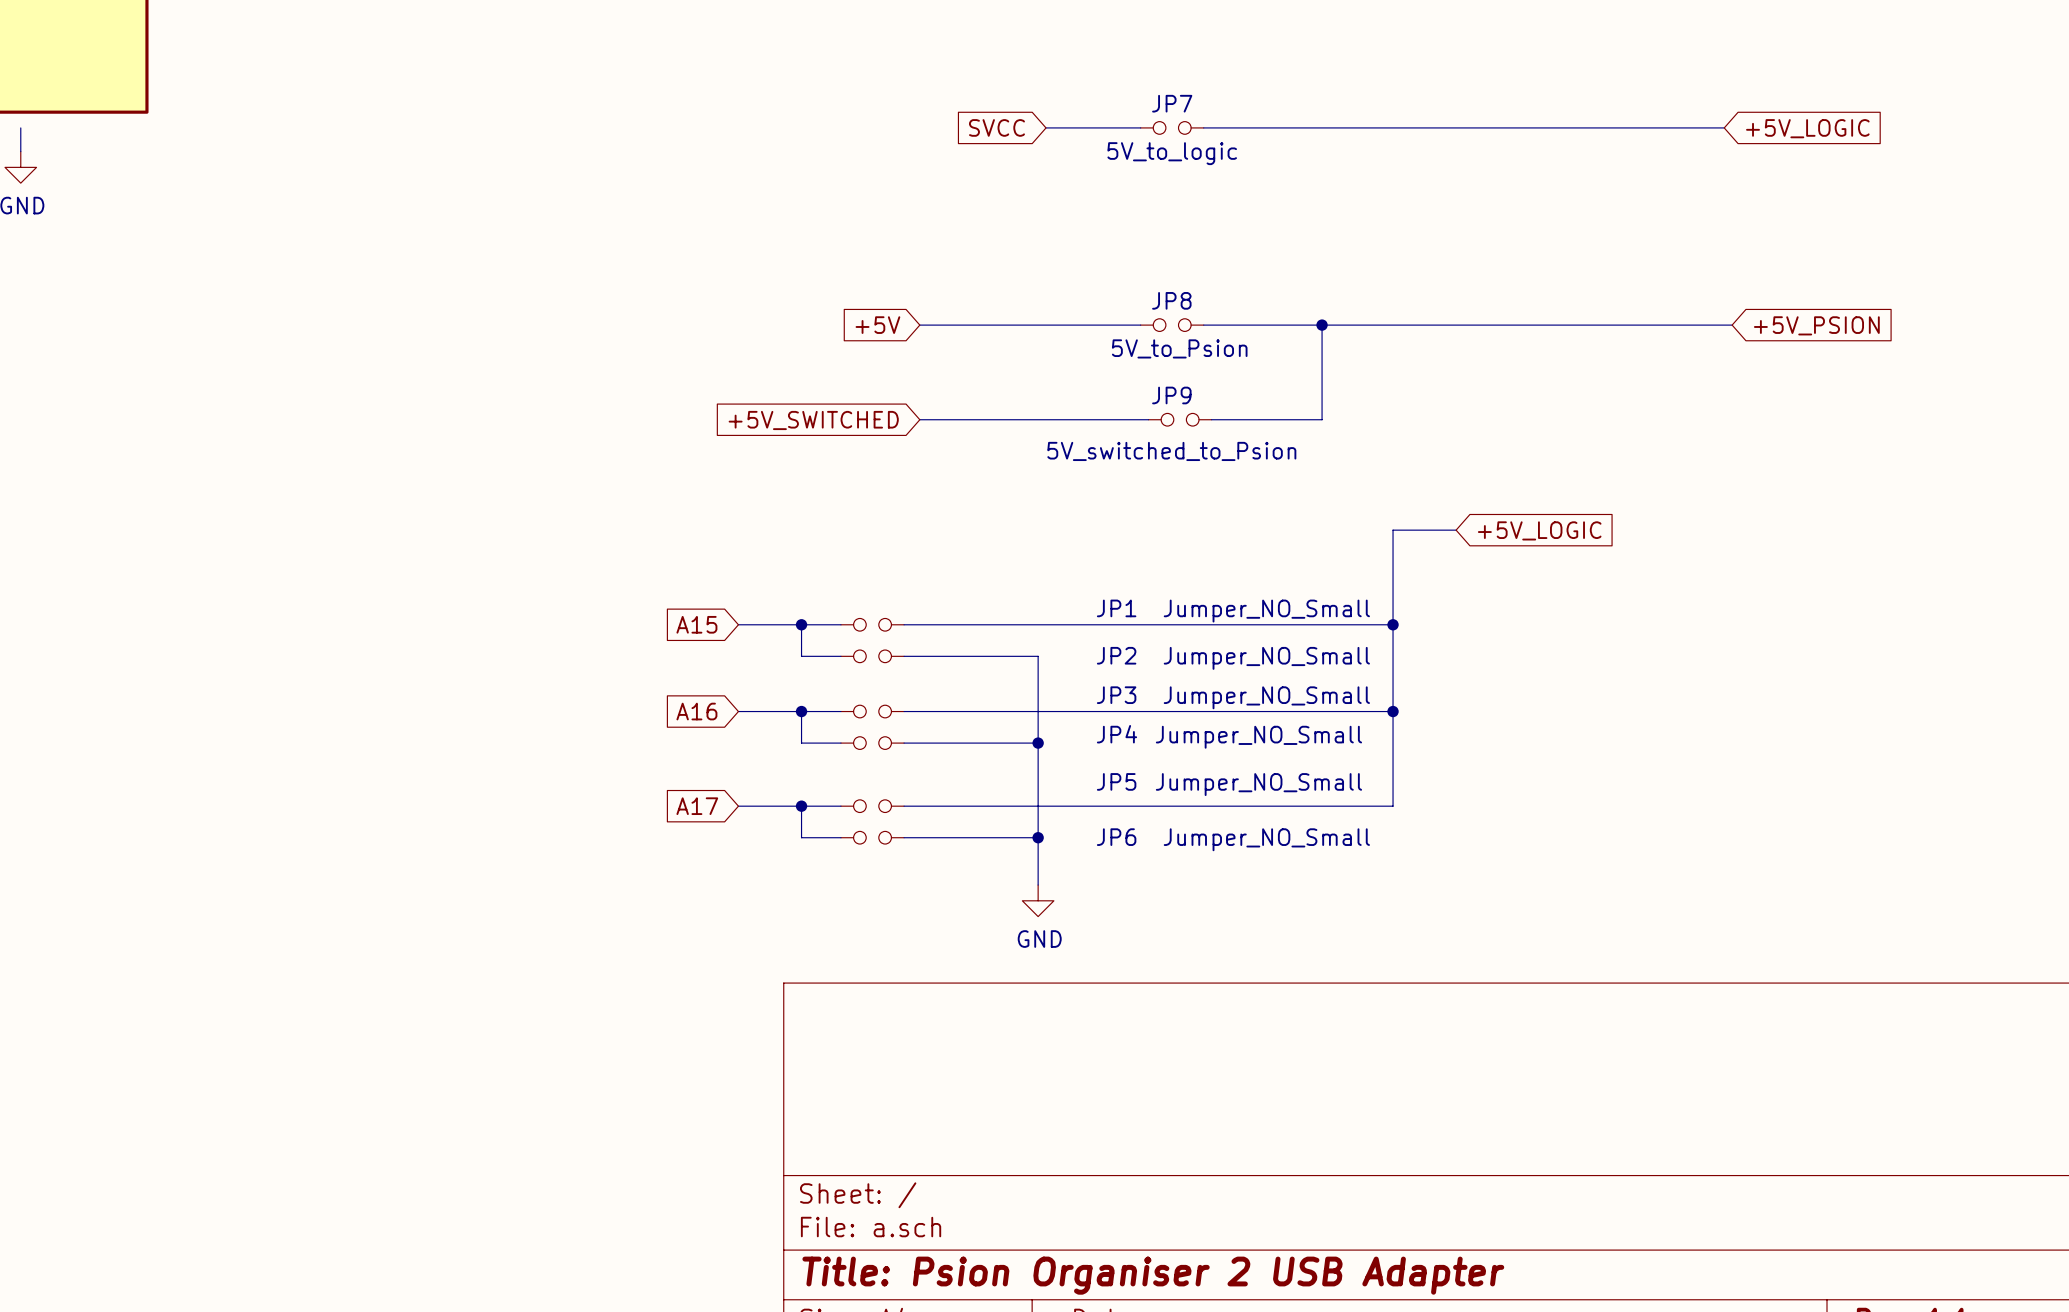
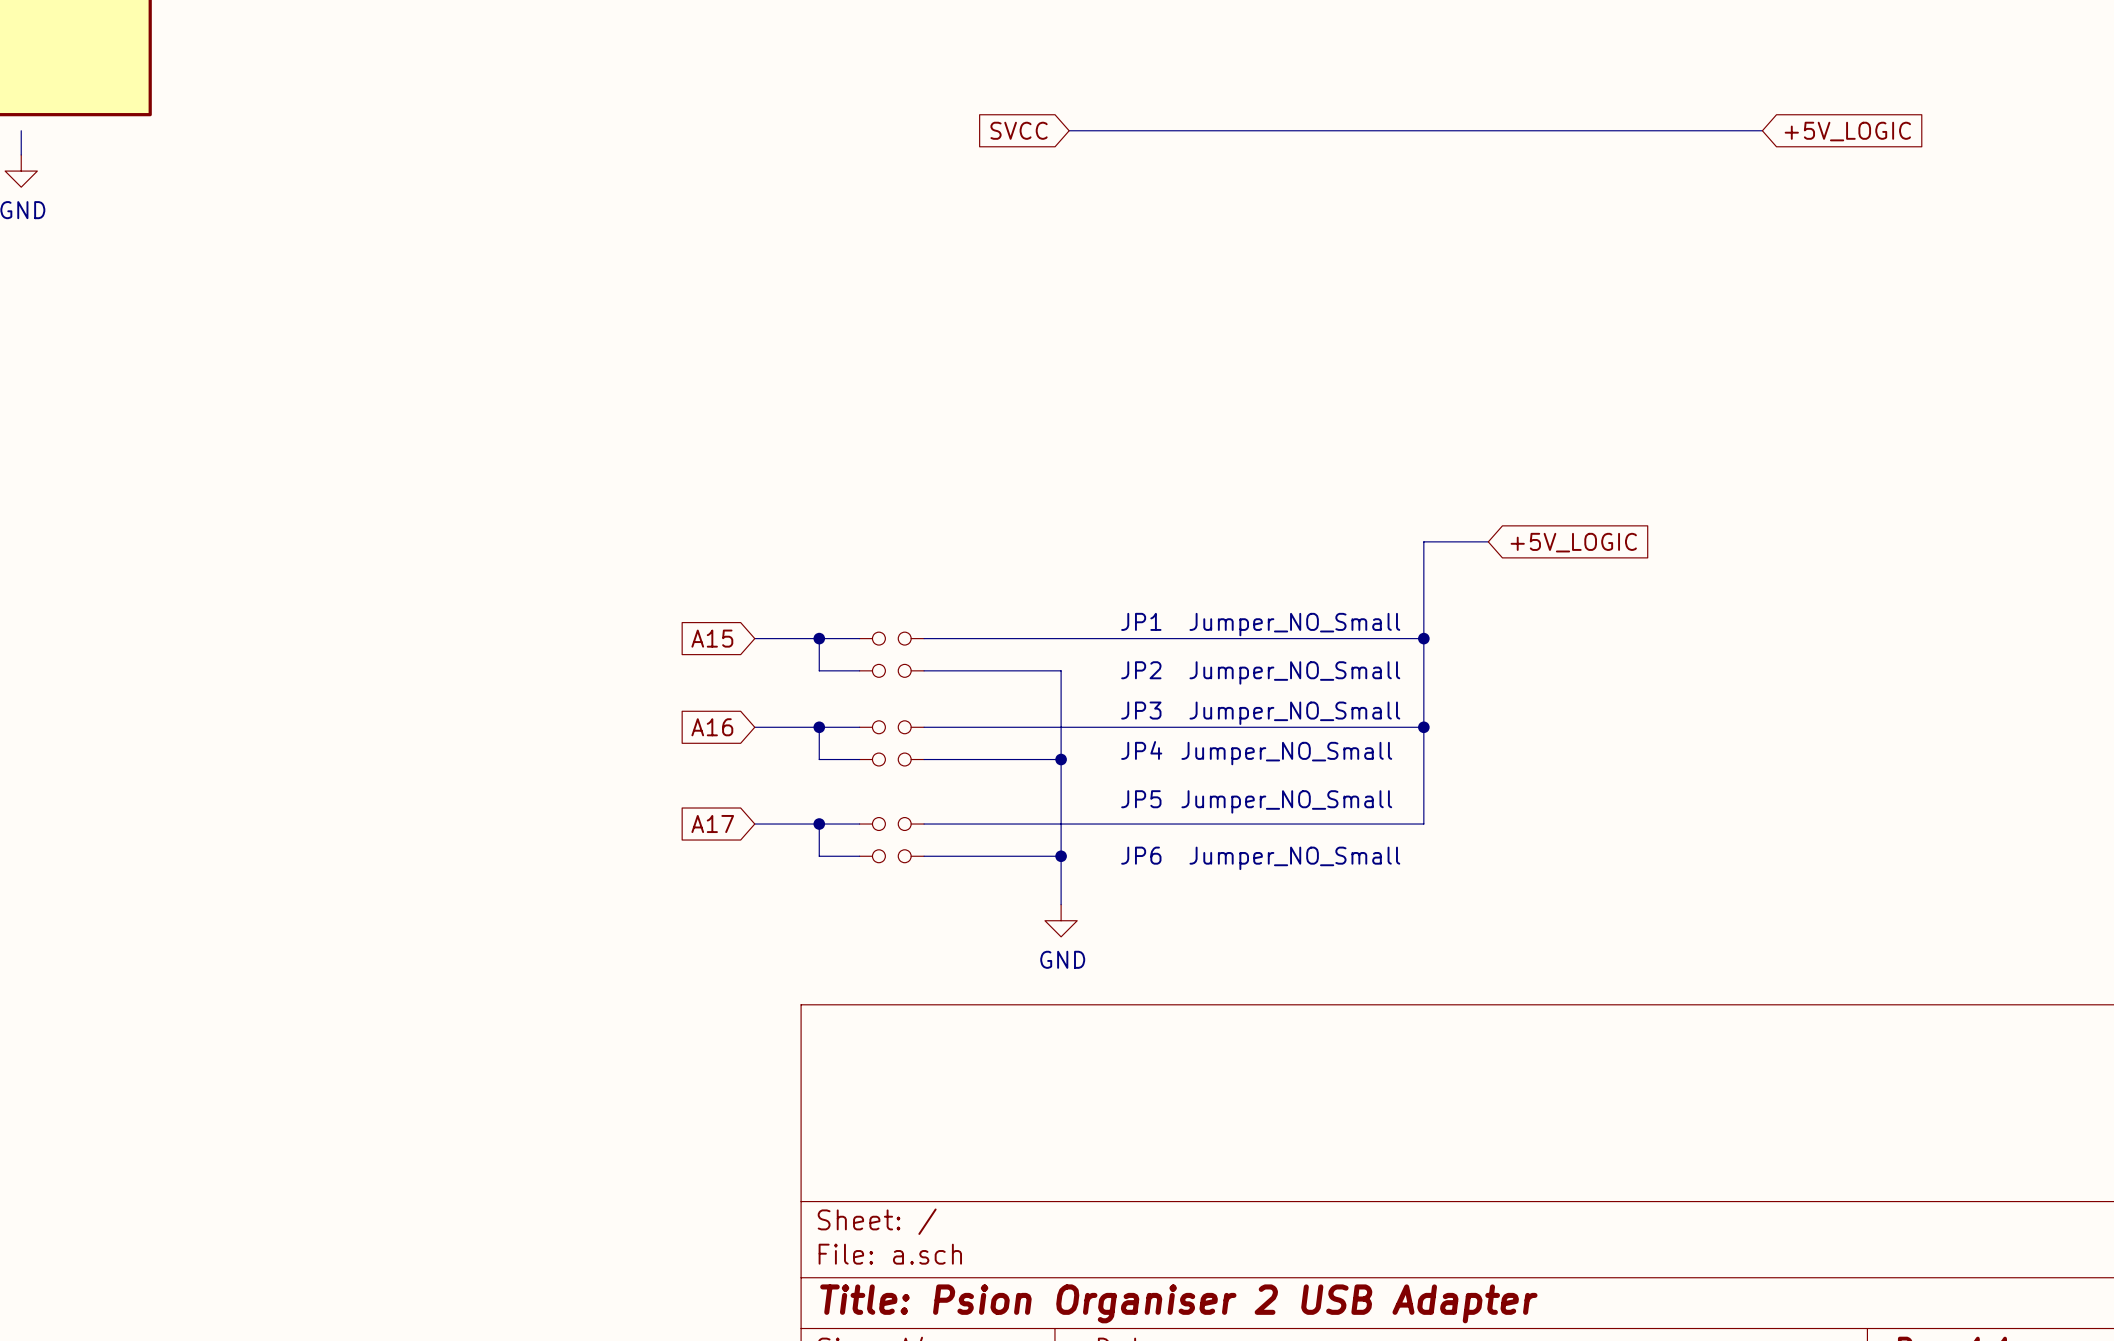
wire: none -> (1165, 130) (1230, 130)
JP7: 5V_to_logic (1172, 127) -> none
global label: +5V (877, 325) -> none
wire: (919, 325) (1140, 325) -> none
JP8: 5V_to_Psion (1172, 325) -> none
wire: (1203, 325) (1732, 325) -> none
wire: (1322, 325) (1322, 419) (1211, 419) -> none
junction: (1322, 325) -> none
global label: +5V_PSION (1816, 325) -> none
wire: (919, 419) (1148, 419) -> none
JP9: 5V_switched_to_Psion (1180, 419) -> none
global label: +5V_SWITCHED (813, 420) -> none

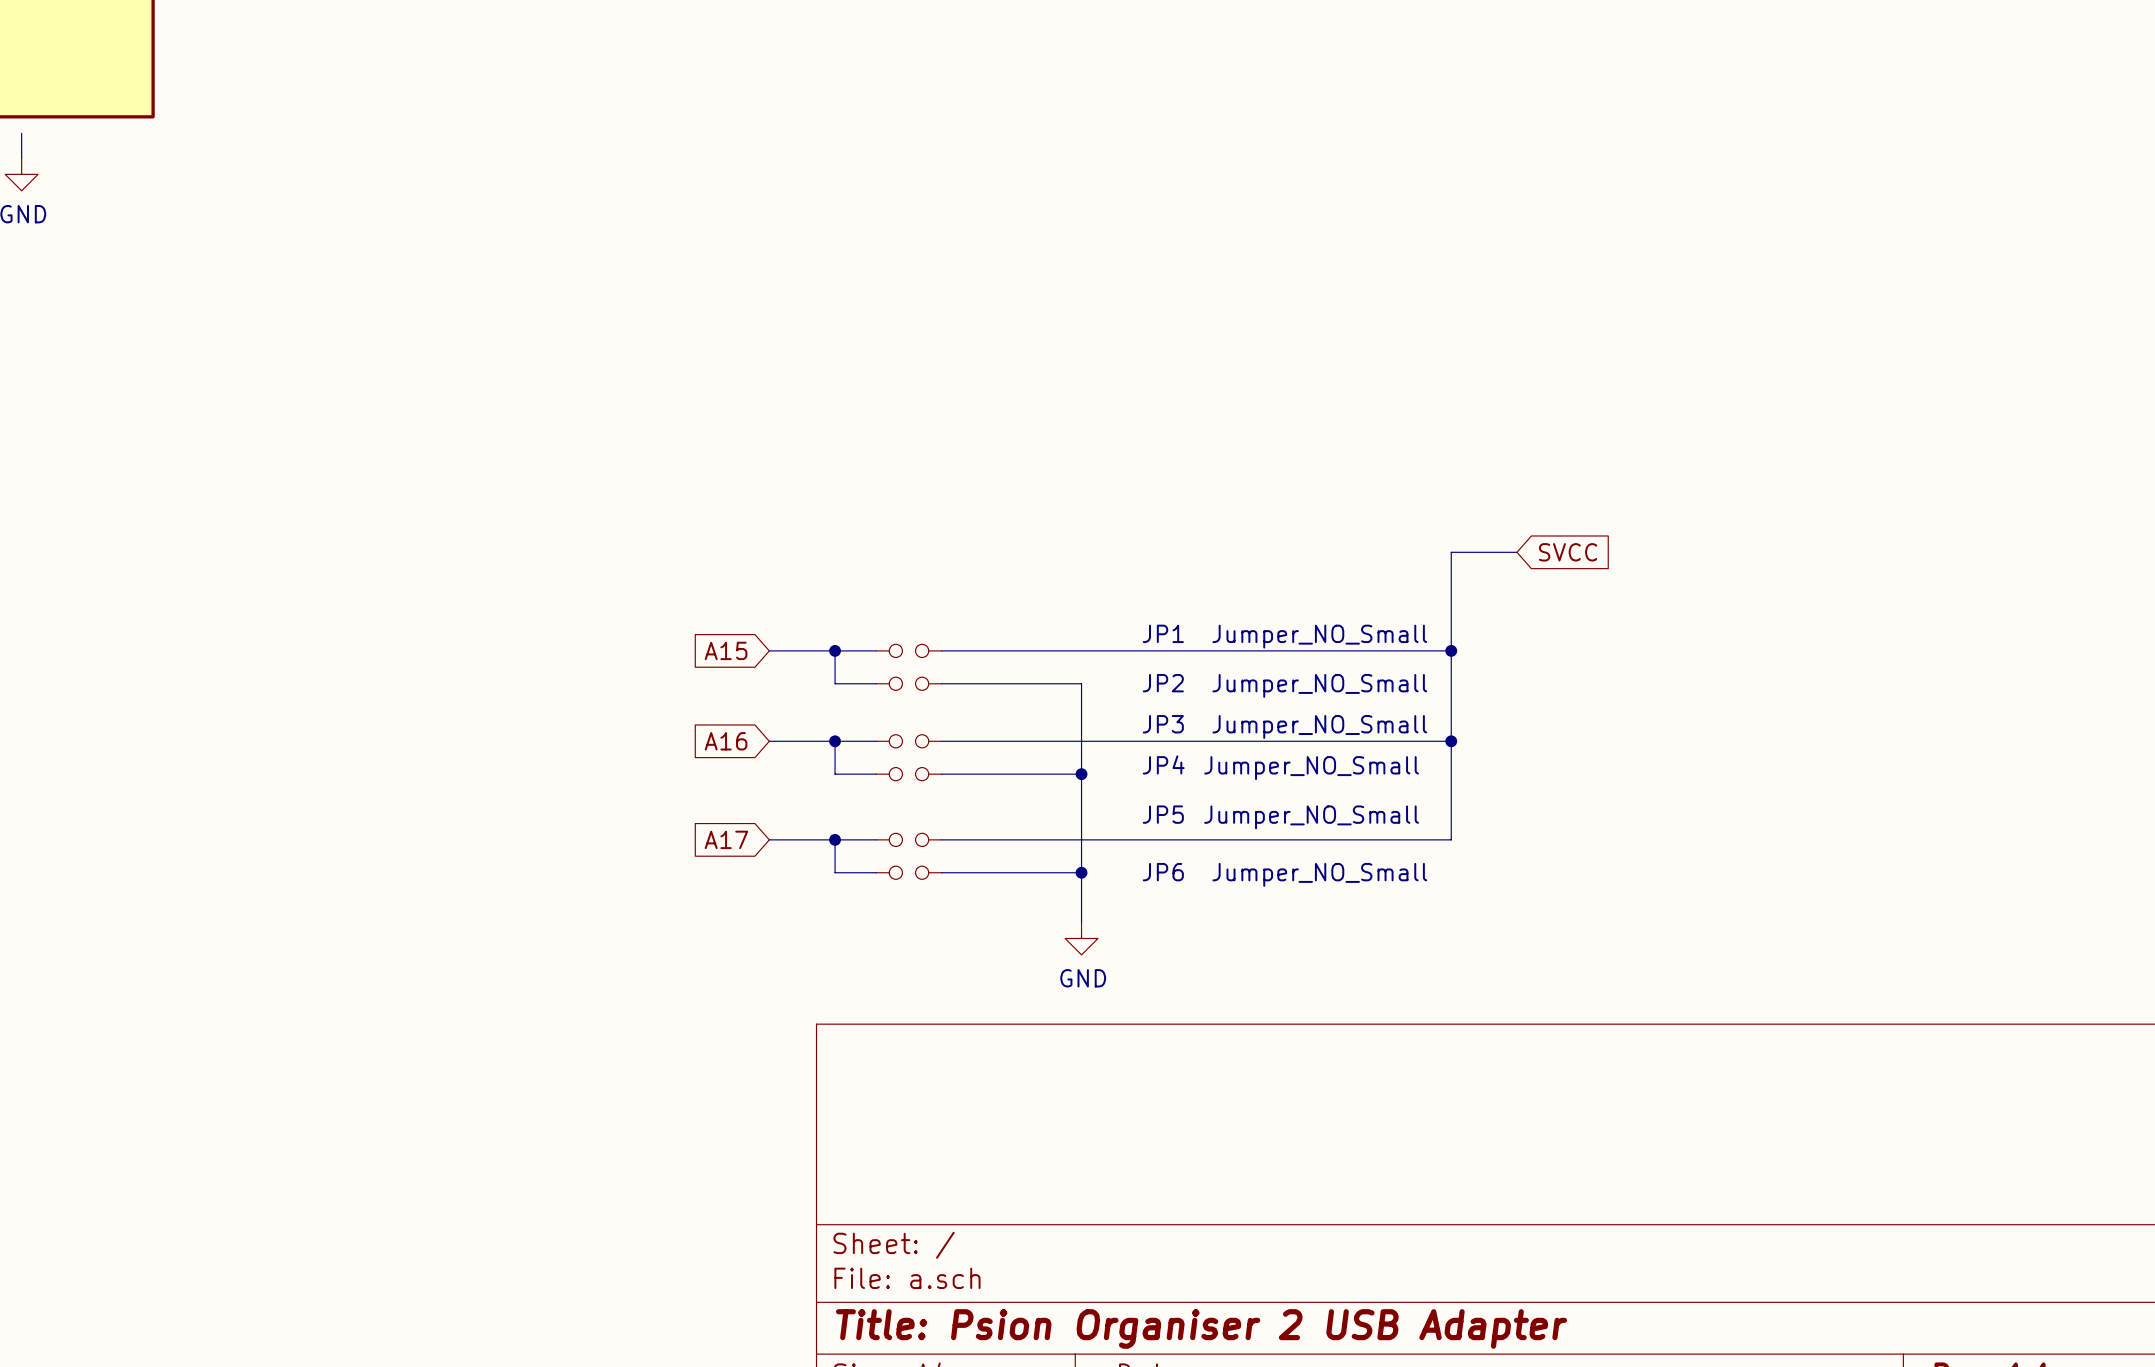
global label: SVCC (1019, 130) -> none
wire: (1069, 130) (1762, 130) -> none
global label: +5V_LOGIC (1847, 131) -> none
global label: +5V_LOGIC (1573, 542) -> SVCC (1568, 552)

